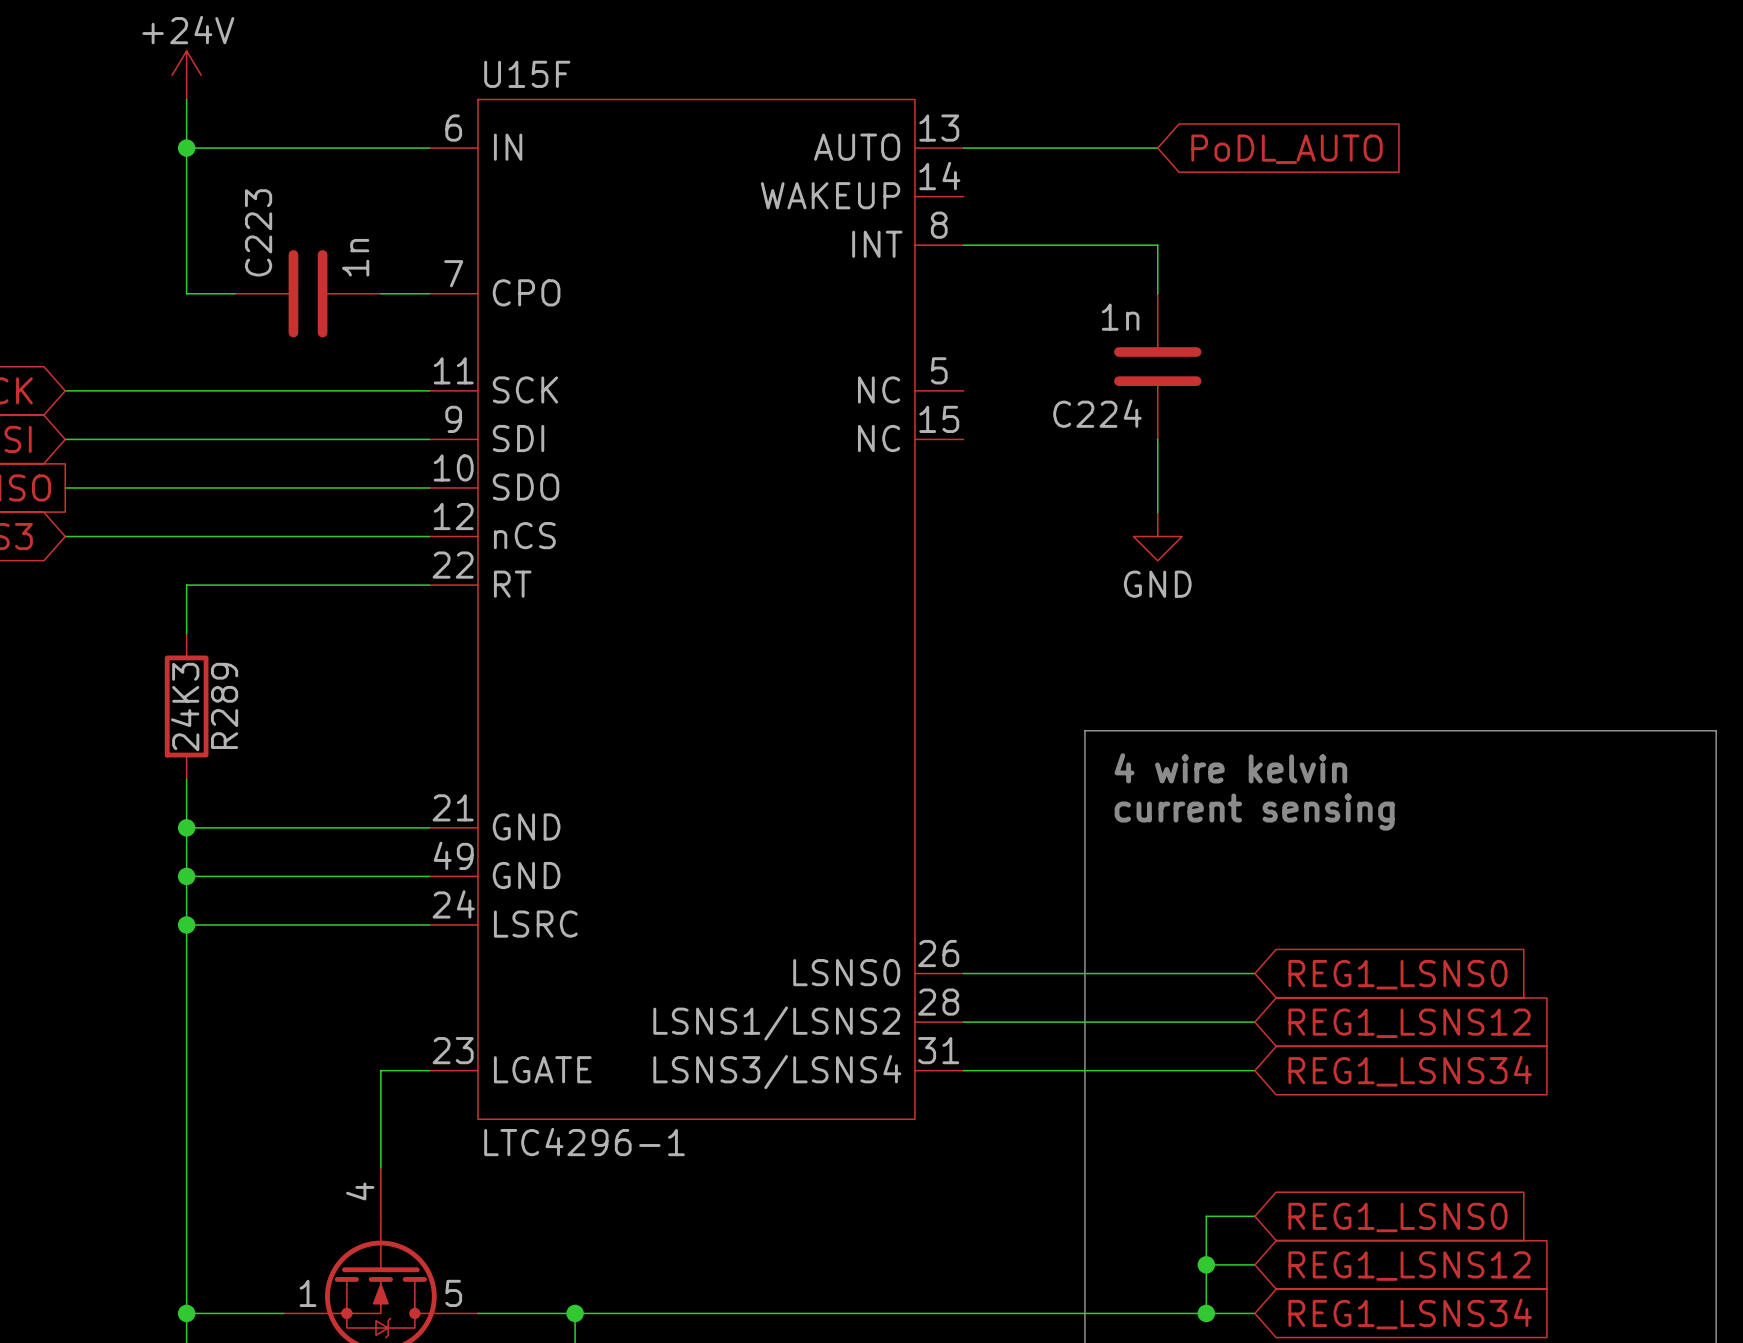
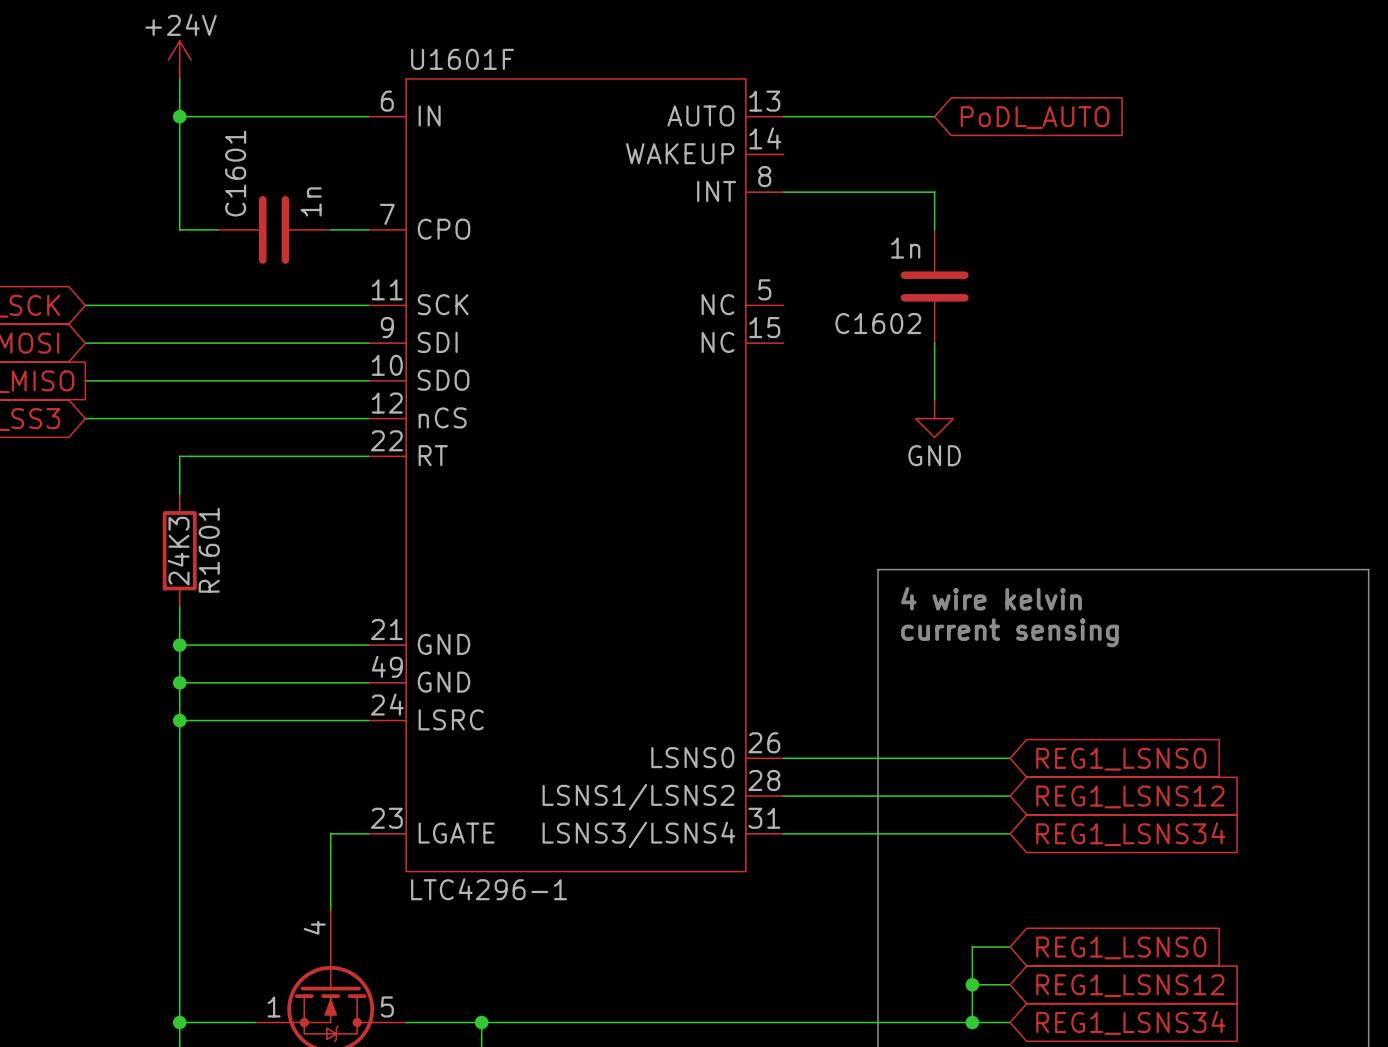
U15F name: U15F (527, 74) -> U1601F (462, 59)
C223 name: C223 (258, 232) -> C1601 (235, 173)
C224 name: C224 (1097, 413) -> C1602 (878, 323)
R289 name: R289 (224, 705) -> R1601 (209, 550)

